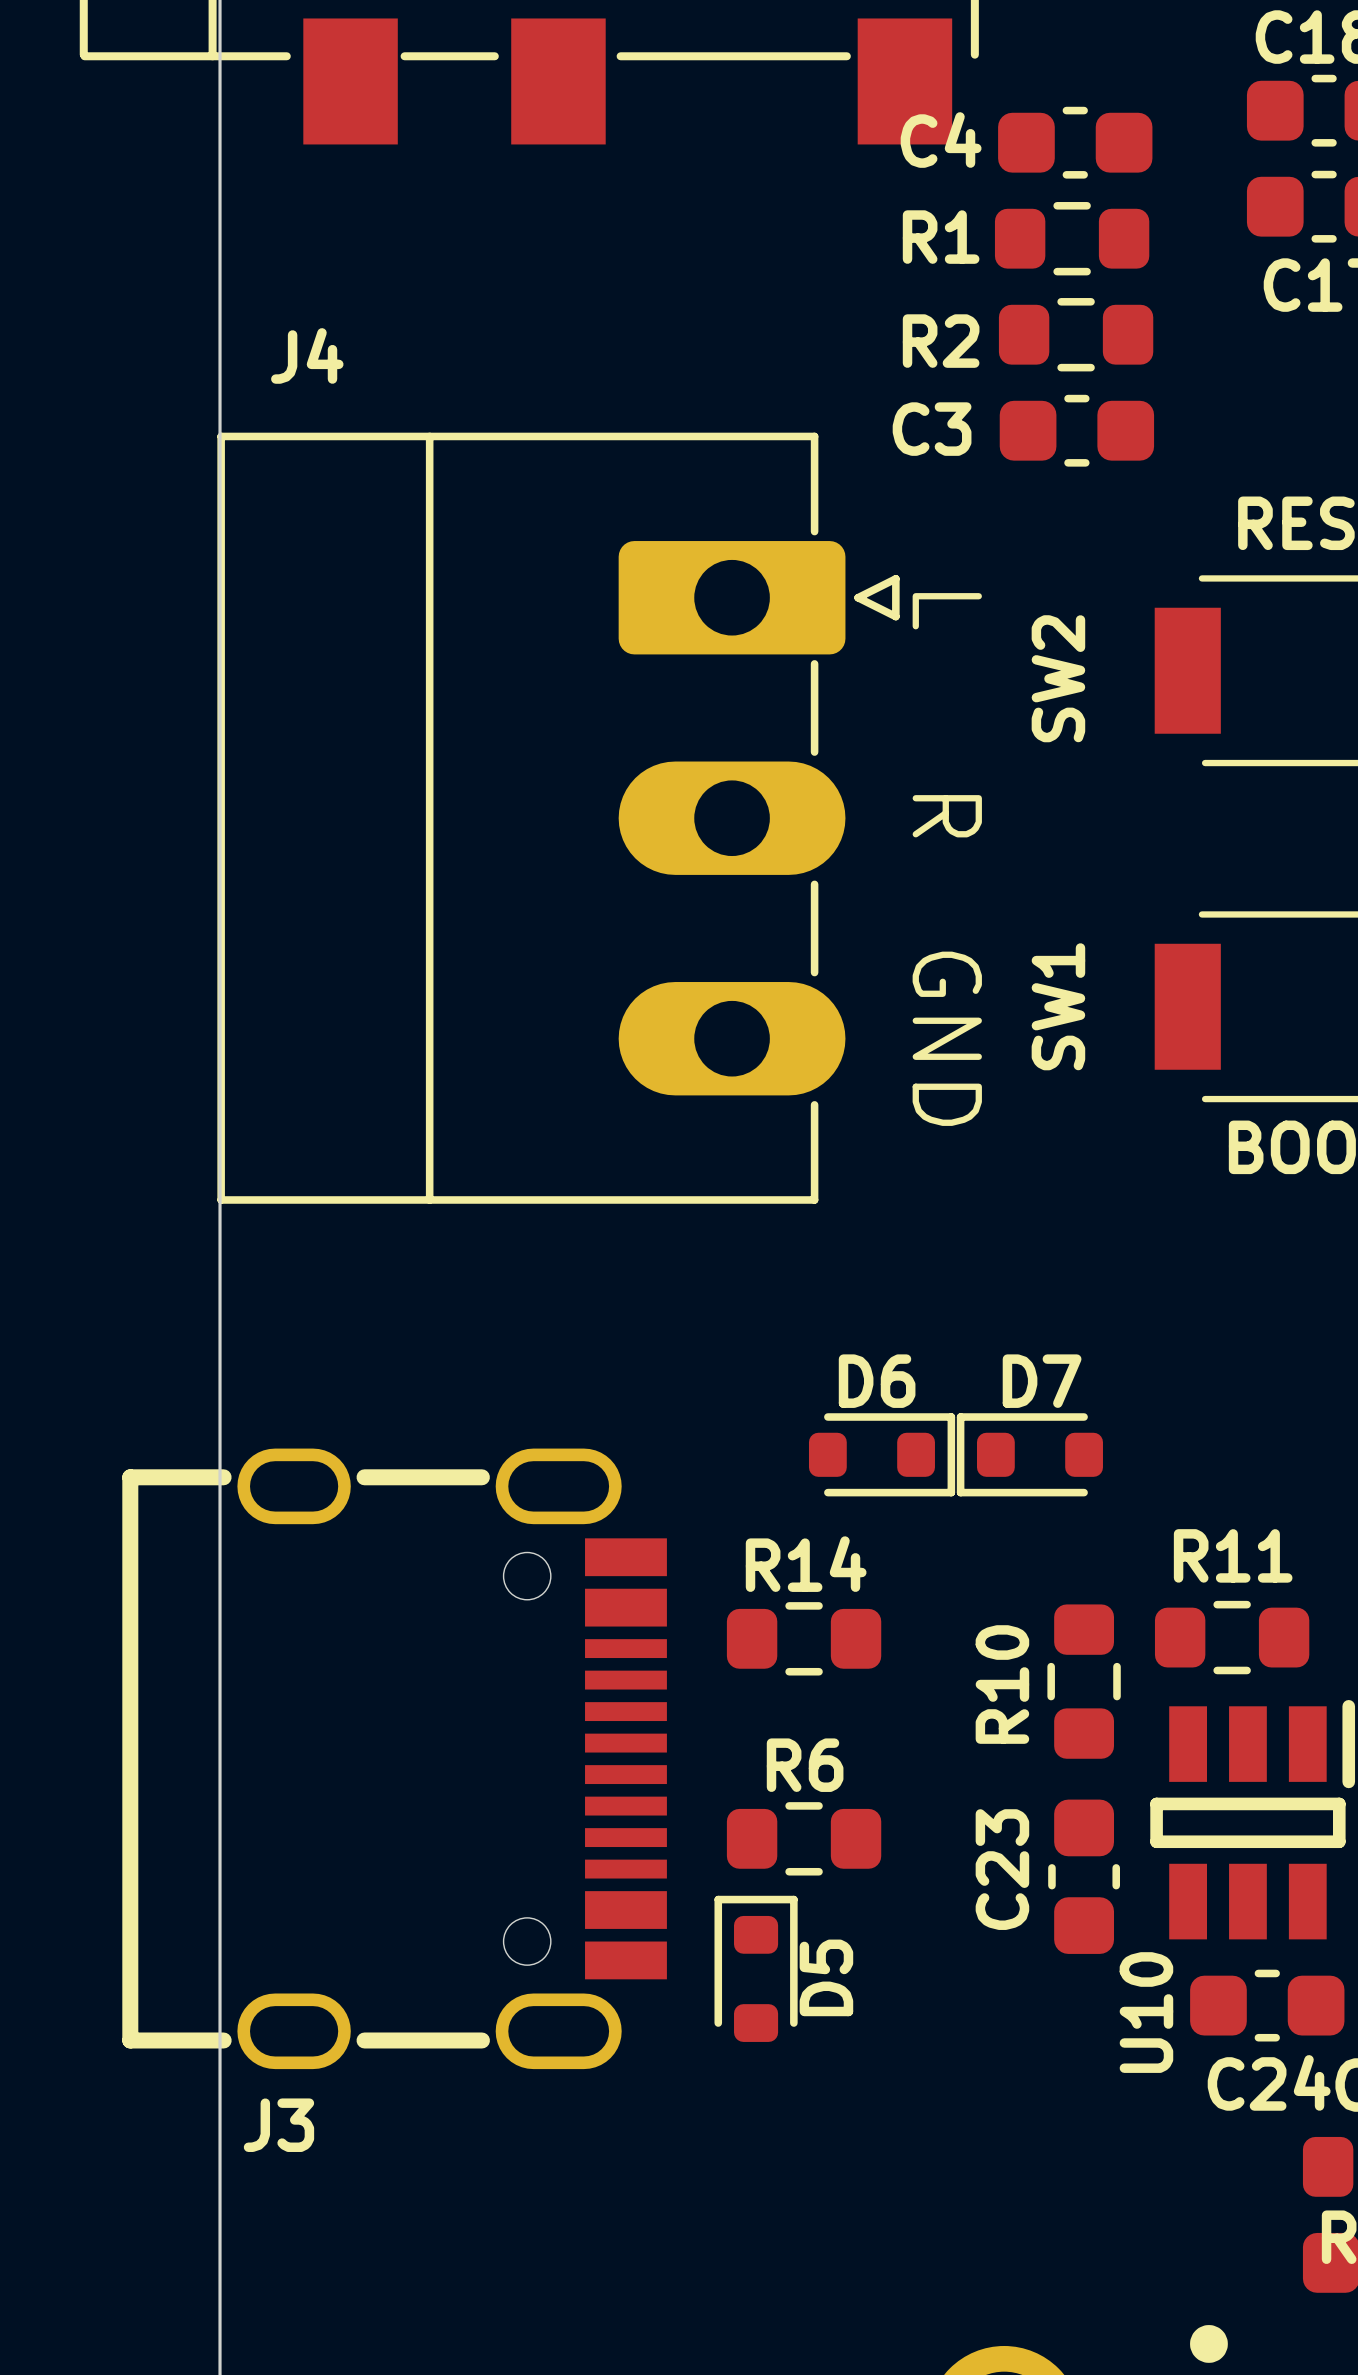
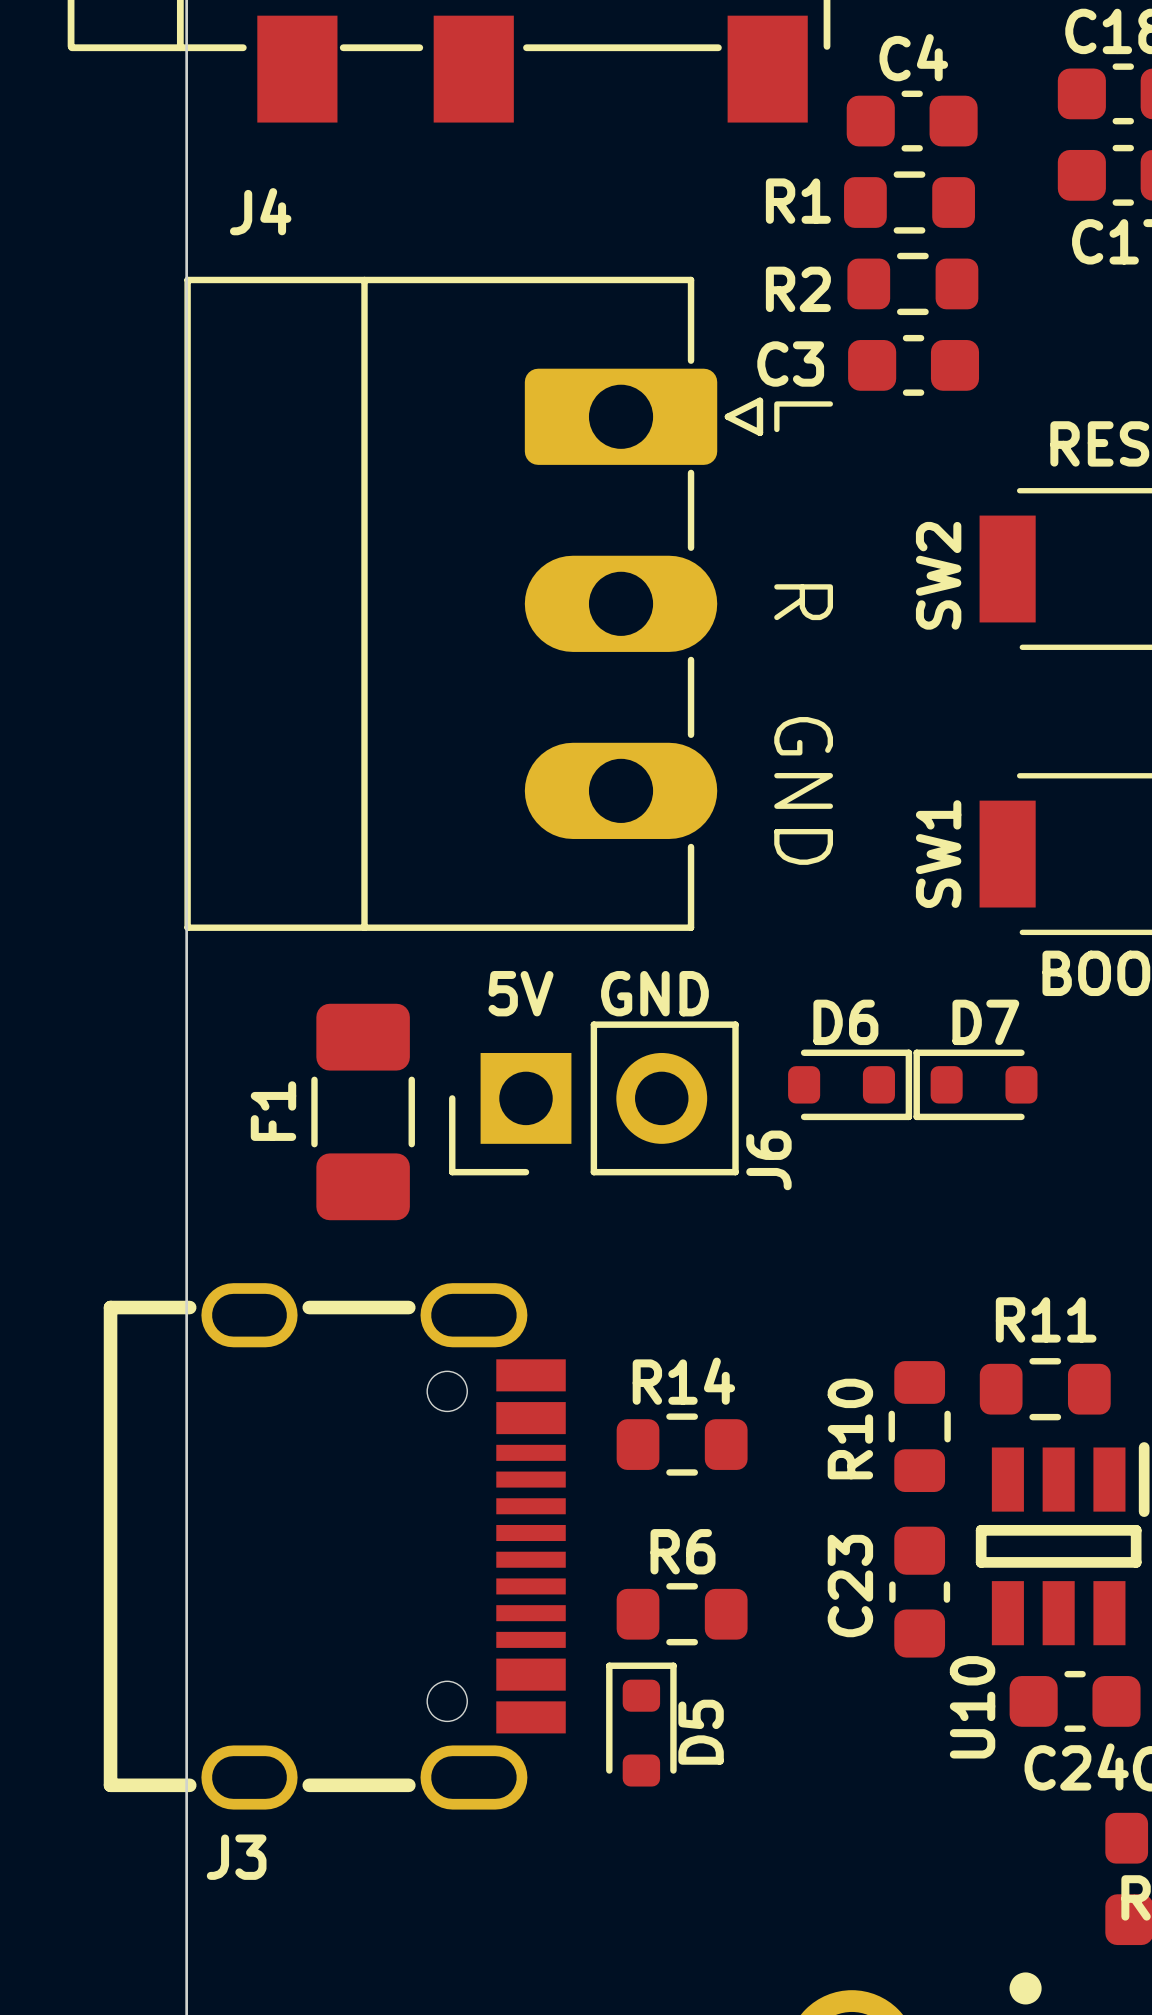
C4 name position: C4 (941, 140) -> C4 (913, 57)
text position: L (947, 611) -> L (803, 416)
SW2 name position: SW2 (1058, 678) -> SW2 (938, 575)
text position: R (947, 816) -> R (803, 602)
J4 position: (558, 818) -> (473, 603)
SW1 name position: SW1 (1058, 1006) -> SW1 (938, 854)
text position: GND (947, 1038) -> GND (803, 790)
text: none -> 5V (521, 993)
text: none -> GND (654, 993)
J6: none -> (593, 1098)
F1: none -> (363, 1111)
D6 position: (882, 1454) -> (850, 1084)
D7 position: (1029, 1454) -> (975, 1084)
R14 position: (804, 1638) -> (682, 1444)
J3 position: (394, 1758) -> (334, 1546)
R6 position: (804, 1838) -> (682, 1614)
D5 position: (756, 1968) -> (641, 1724)

